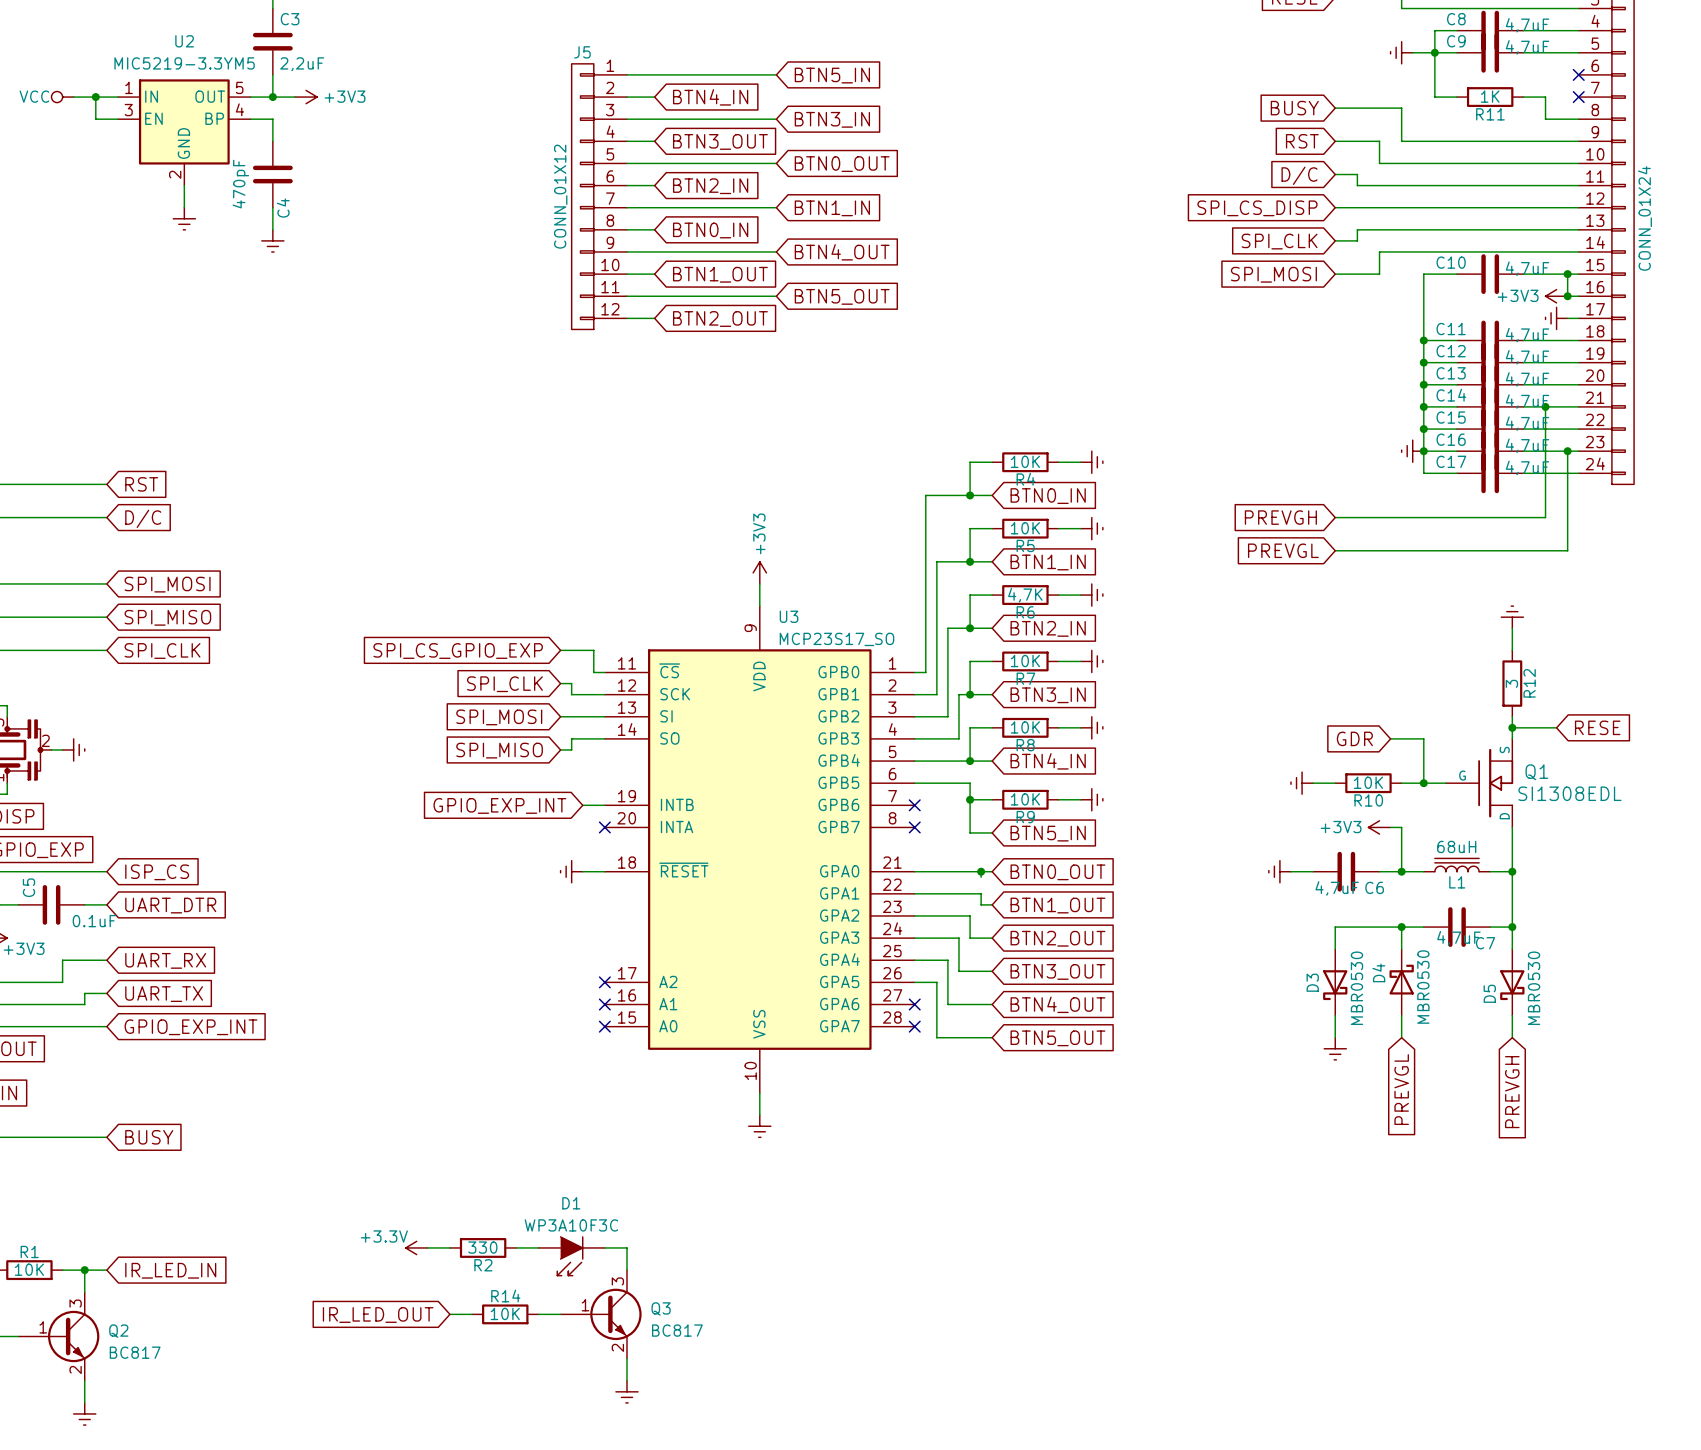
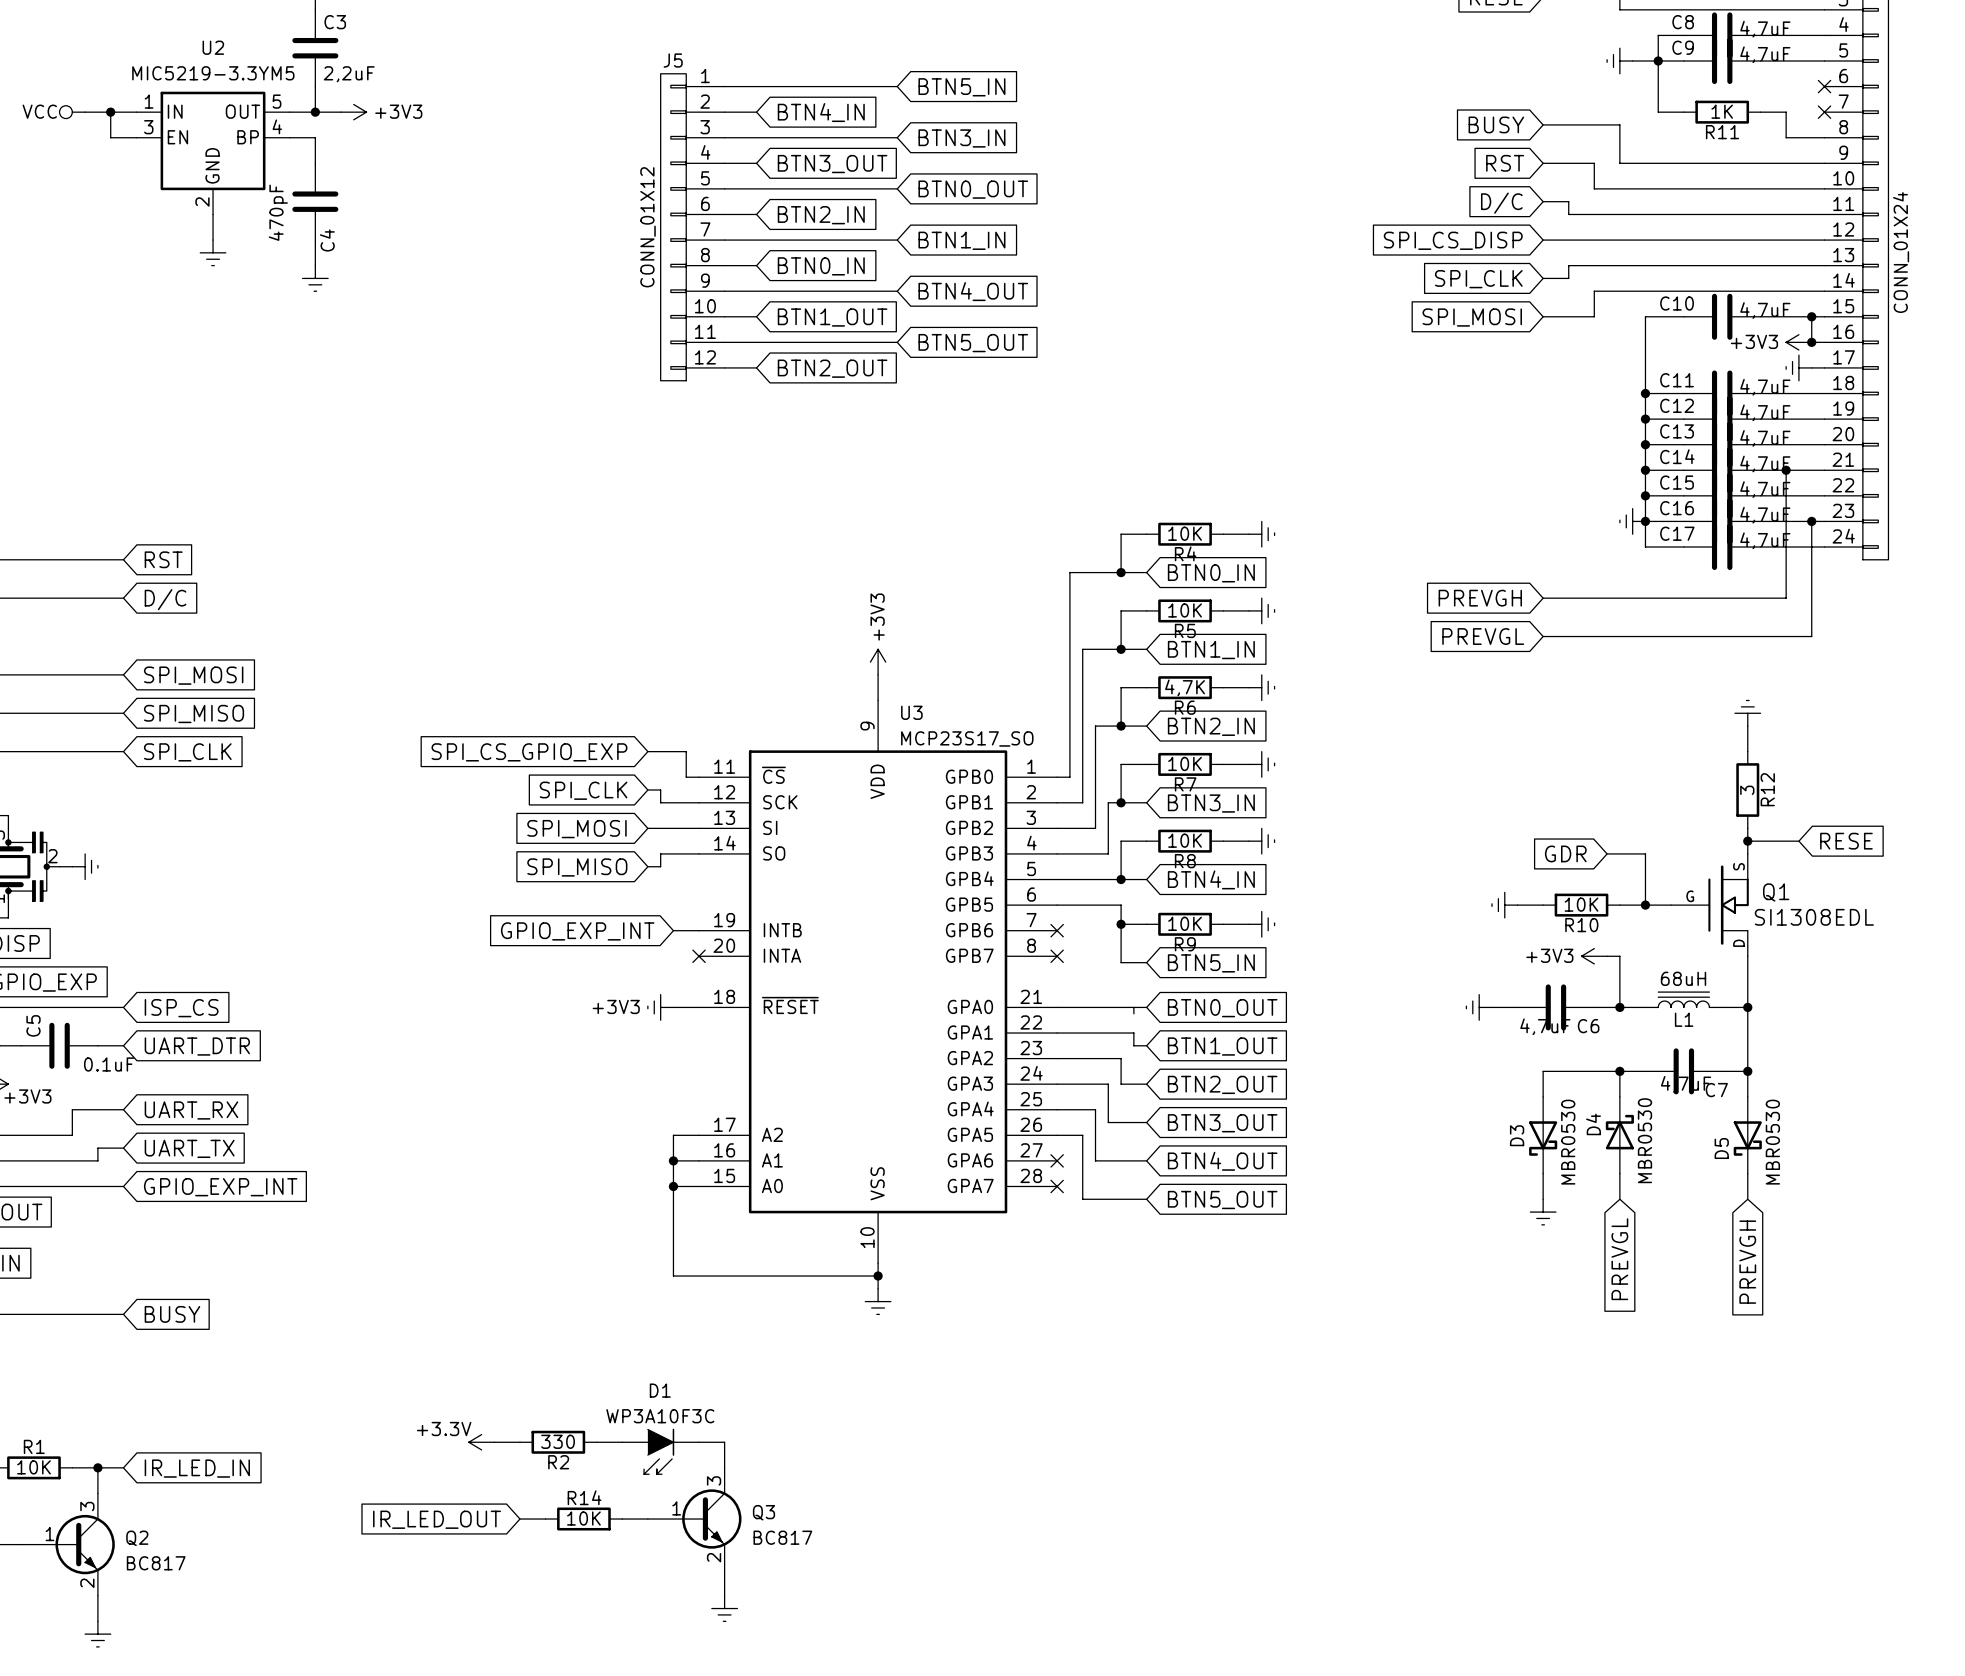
power symbol text: none -> +3V3 (616, 1006)
junction: (981, 871) -> none
wire: none -> (699, 1135) (673, 1135) (673, 1276) (878, 1276)
no-connect mark: (604, 982) -> none
wire: none -> (673, 1160) (699, 1160)
junction: none -> (673, 1160)
no-connect mark: (604, 1004) -> none
wire: none -> (673, 1186) (699, 1186)
junction: none -> (673, 1186)
no-connect mark: (604, 1026) -> none
junction: none -> (878, 1276)

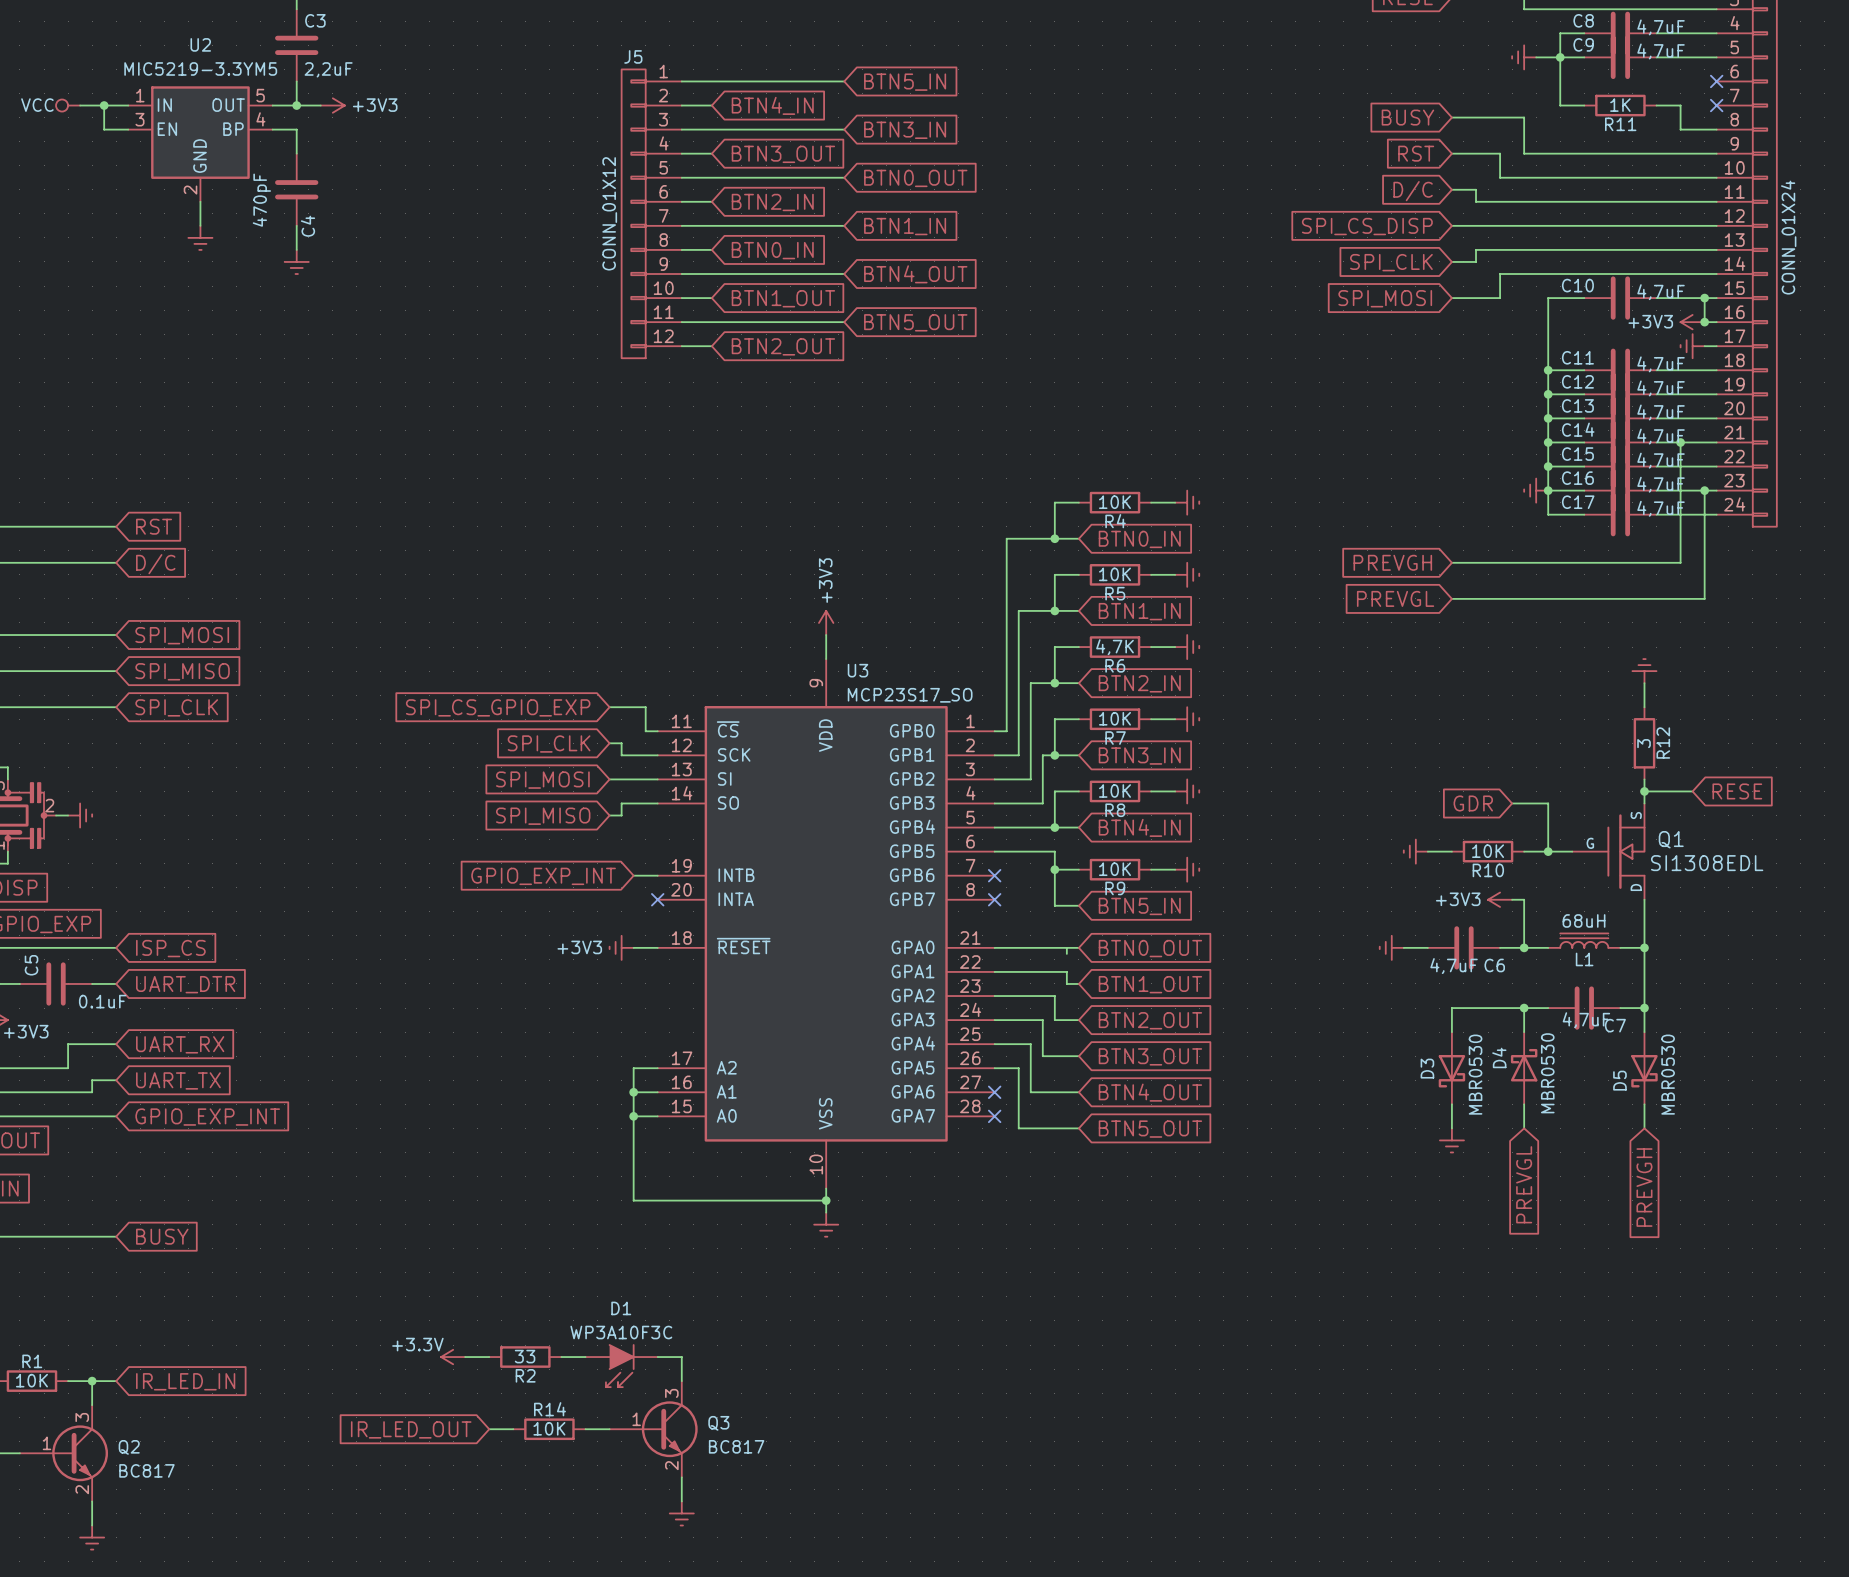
R2 value: 330 (558, 1441) -> 33 (525, 1356)

